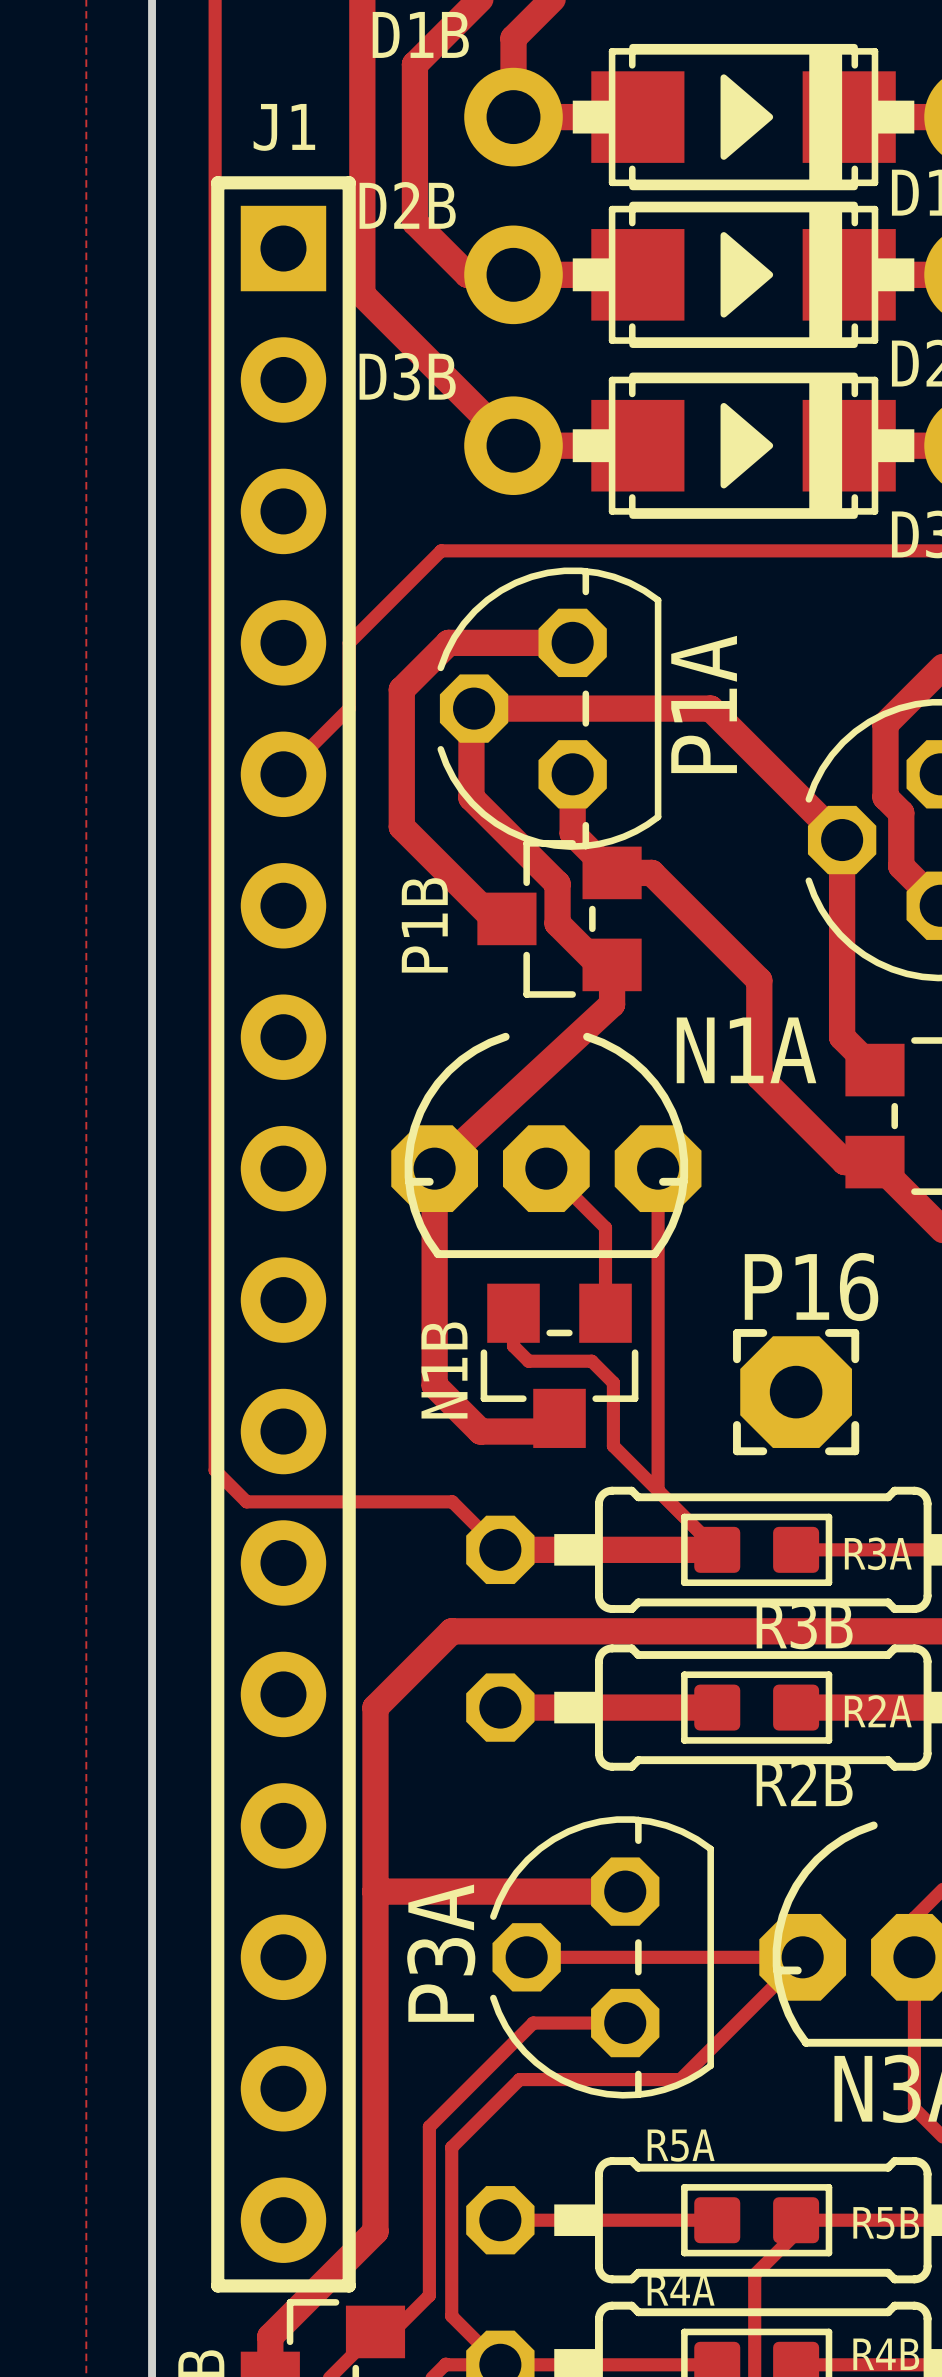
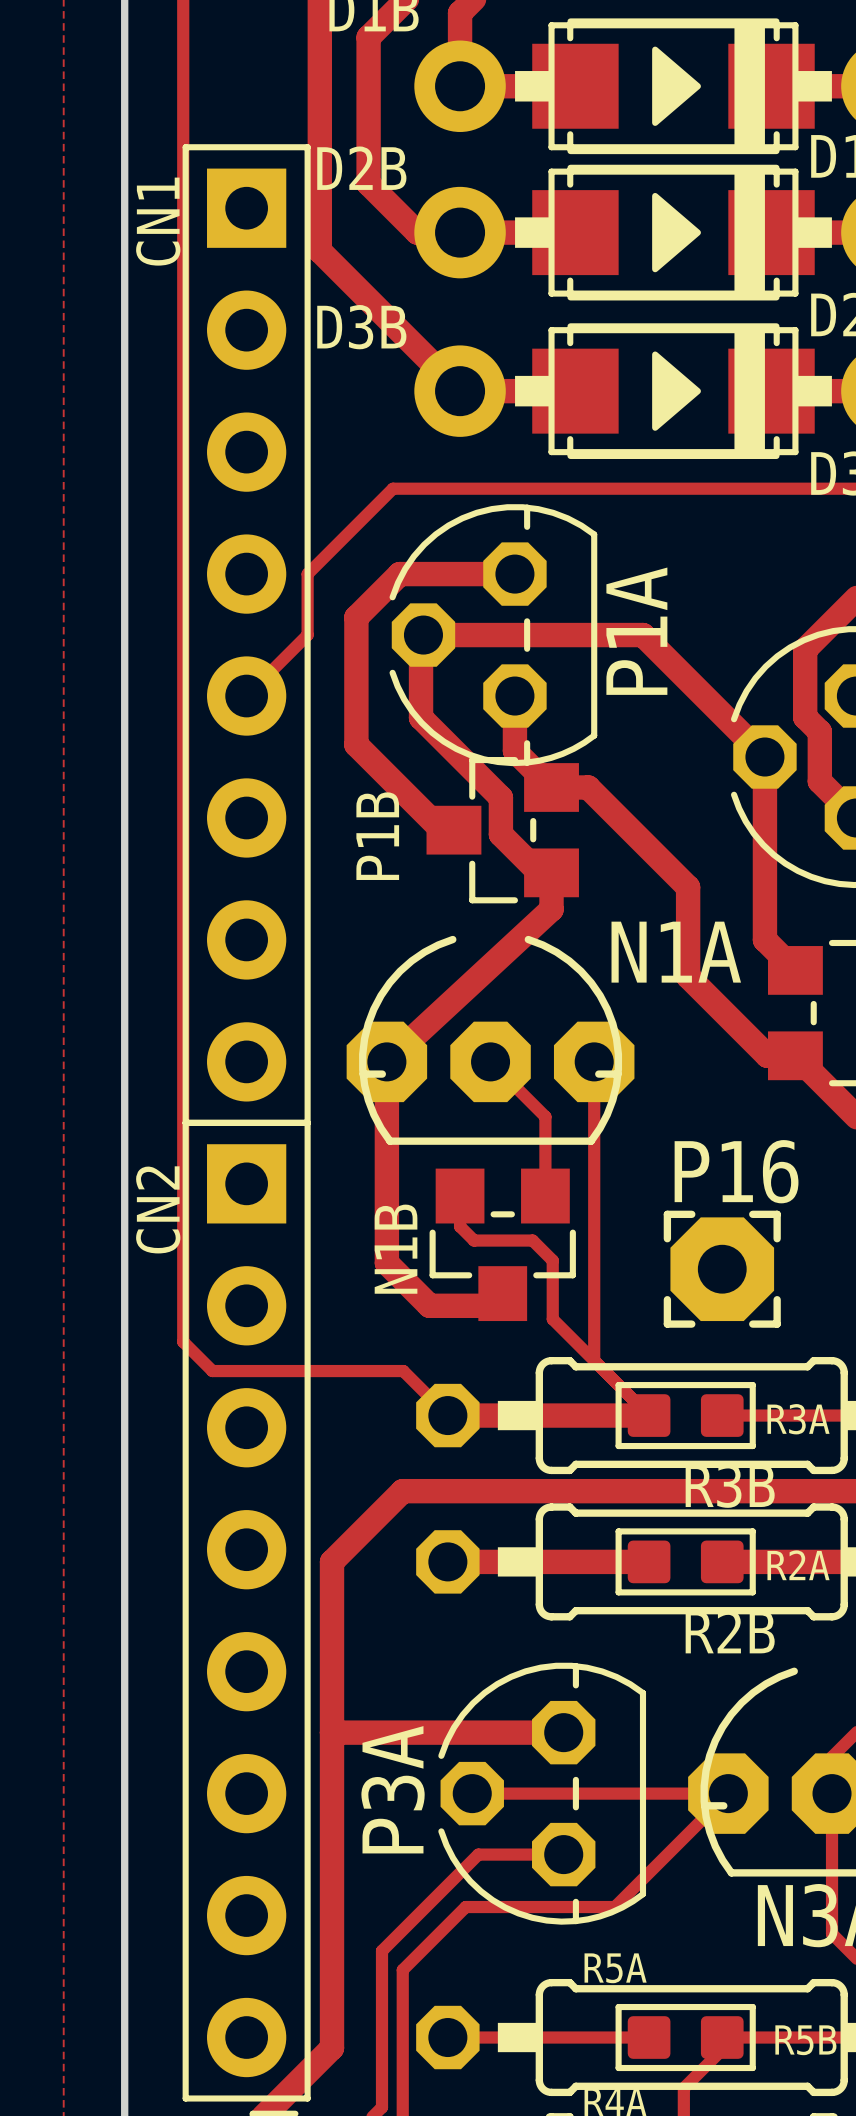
CN1: none -> (246, 635)
J1: (283, 1234) -> none
CN2: none -> (246, 1610)

